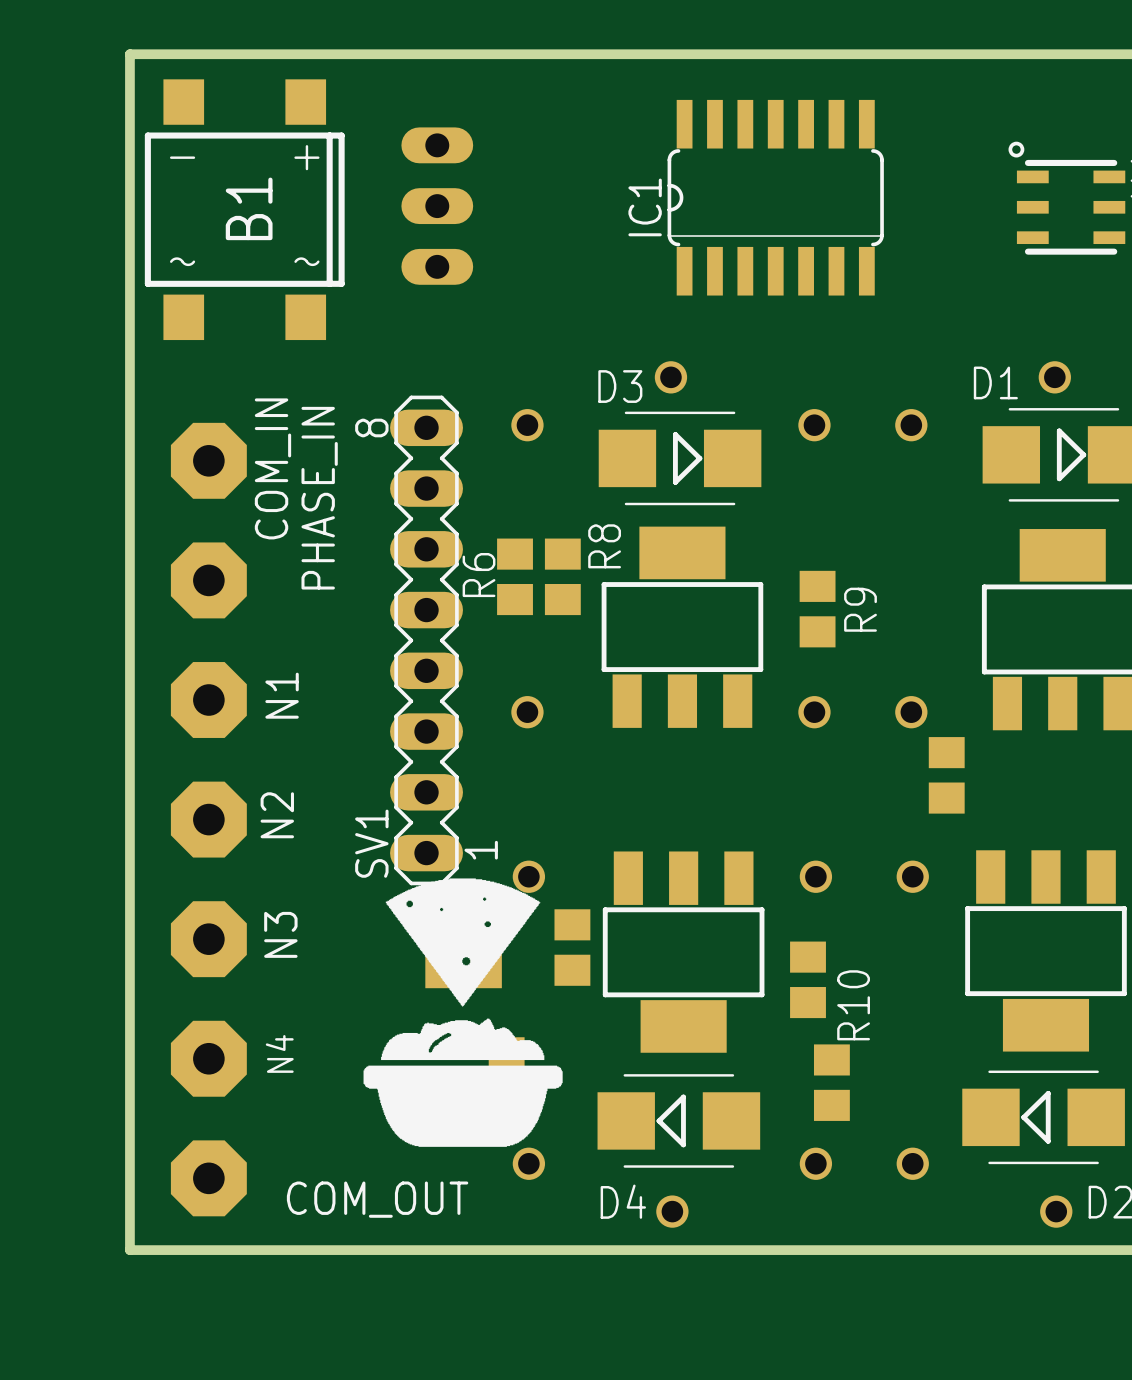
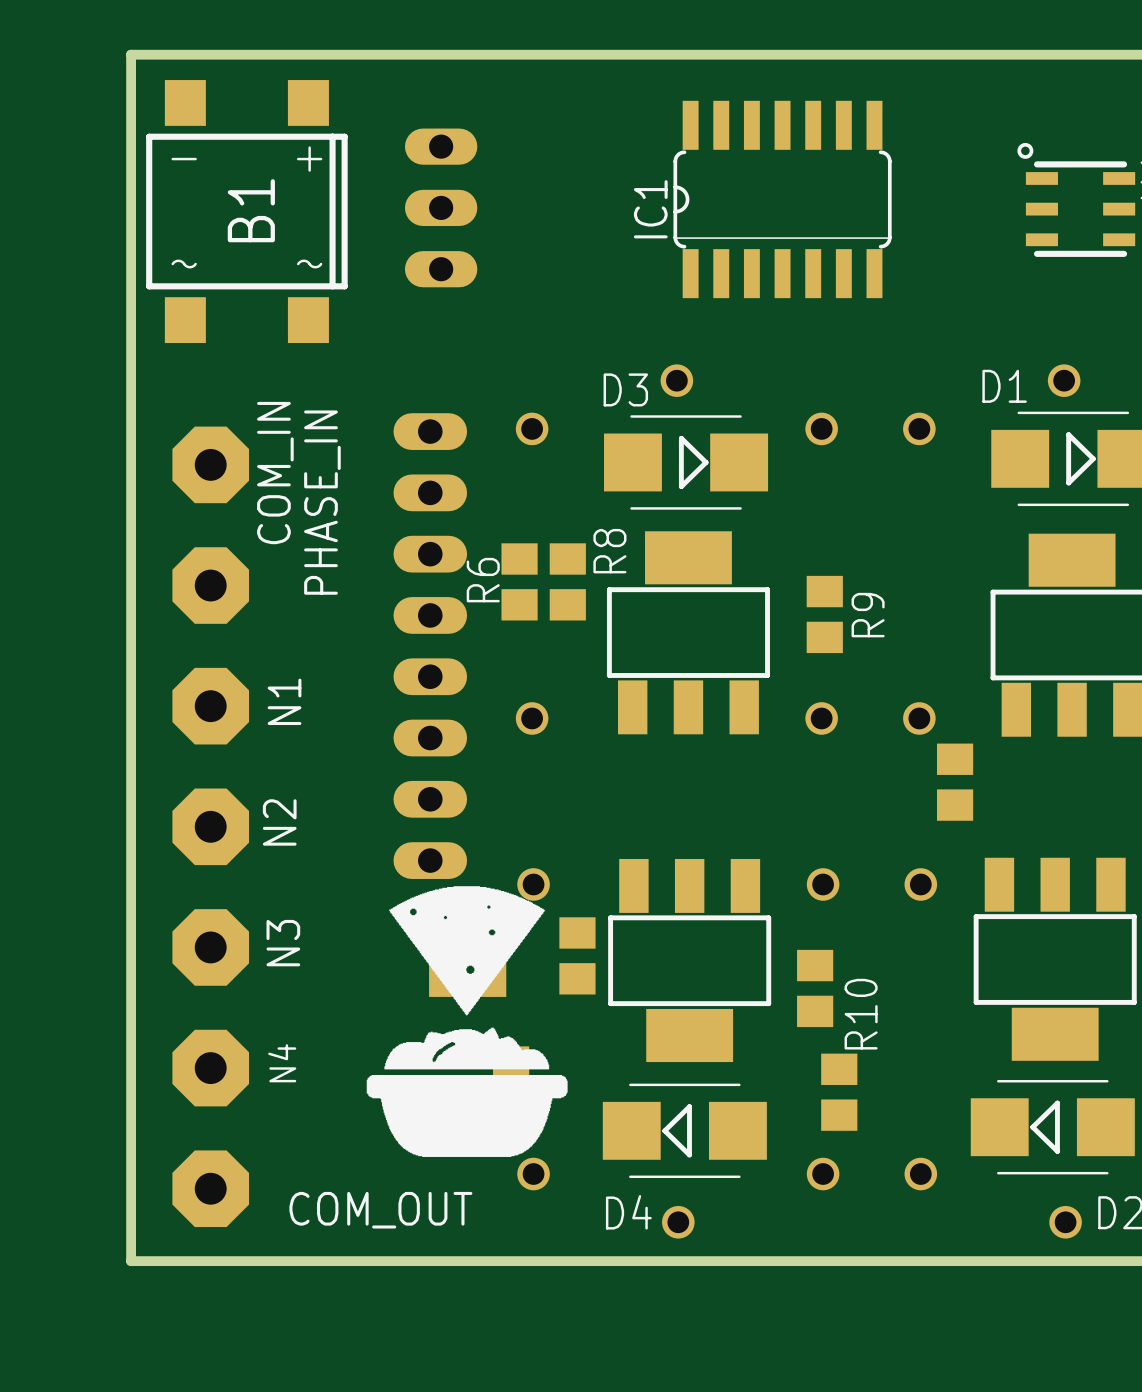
SV1: (426, 640) -> none
part: none -> (430, 646)

